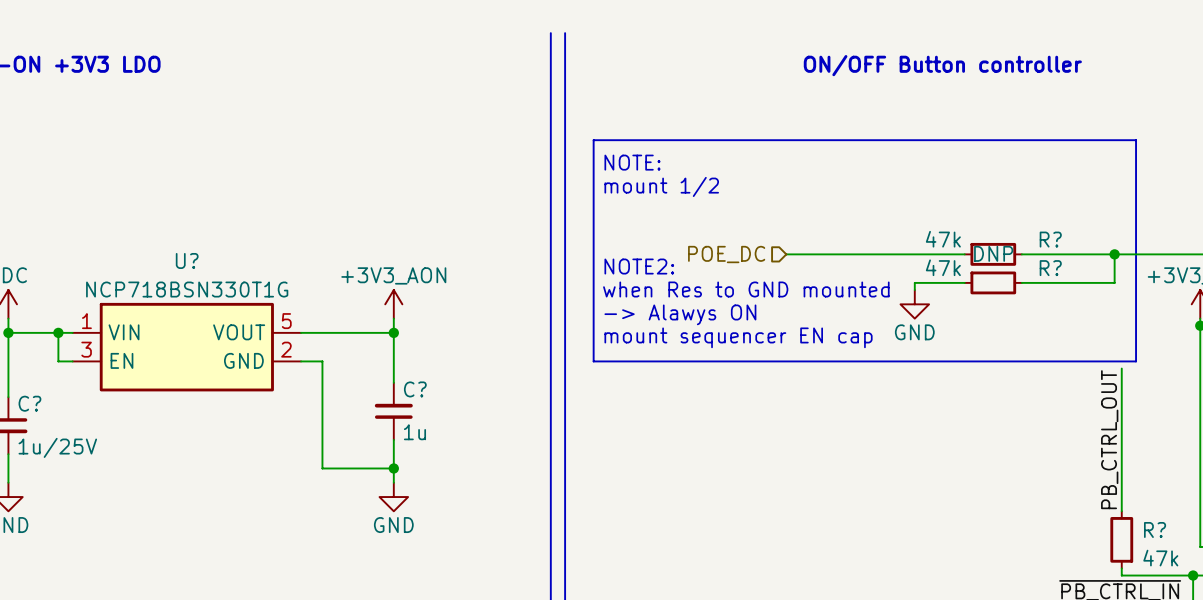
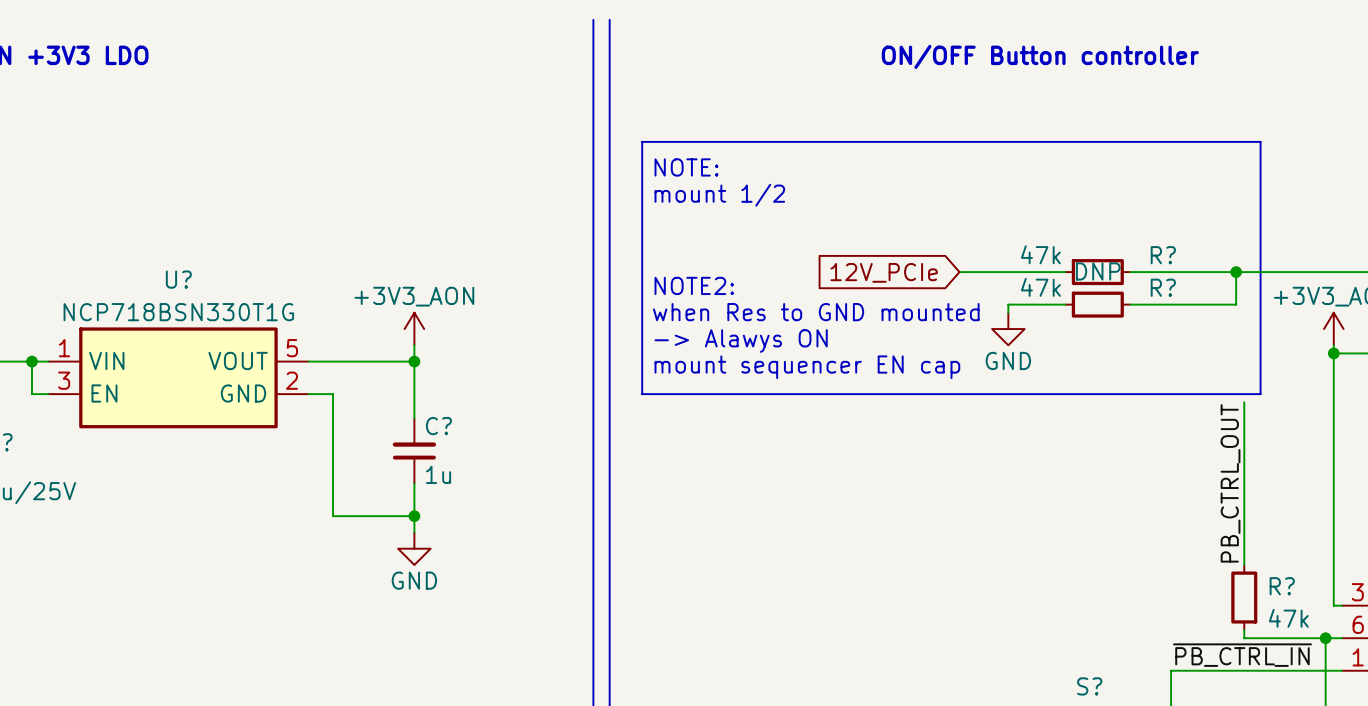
hierarchical label: POE_DC (726, 254) -> none
wire: (786, 254) (871, 254) -> none
global label: none -> 12V_PCIe (884, 272)

